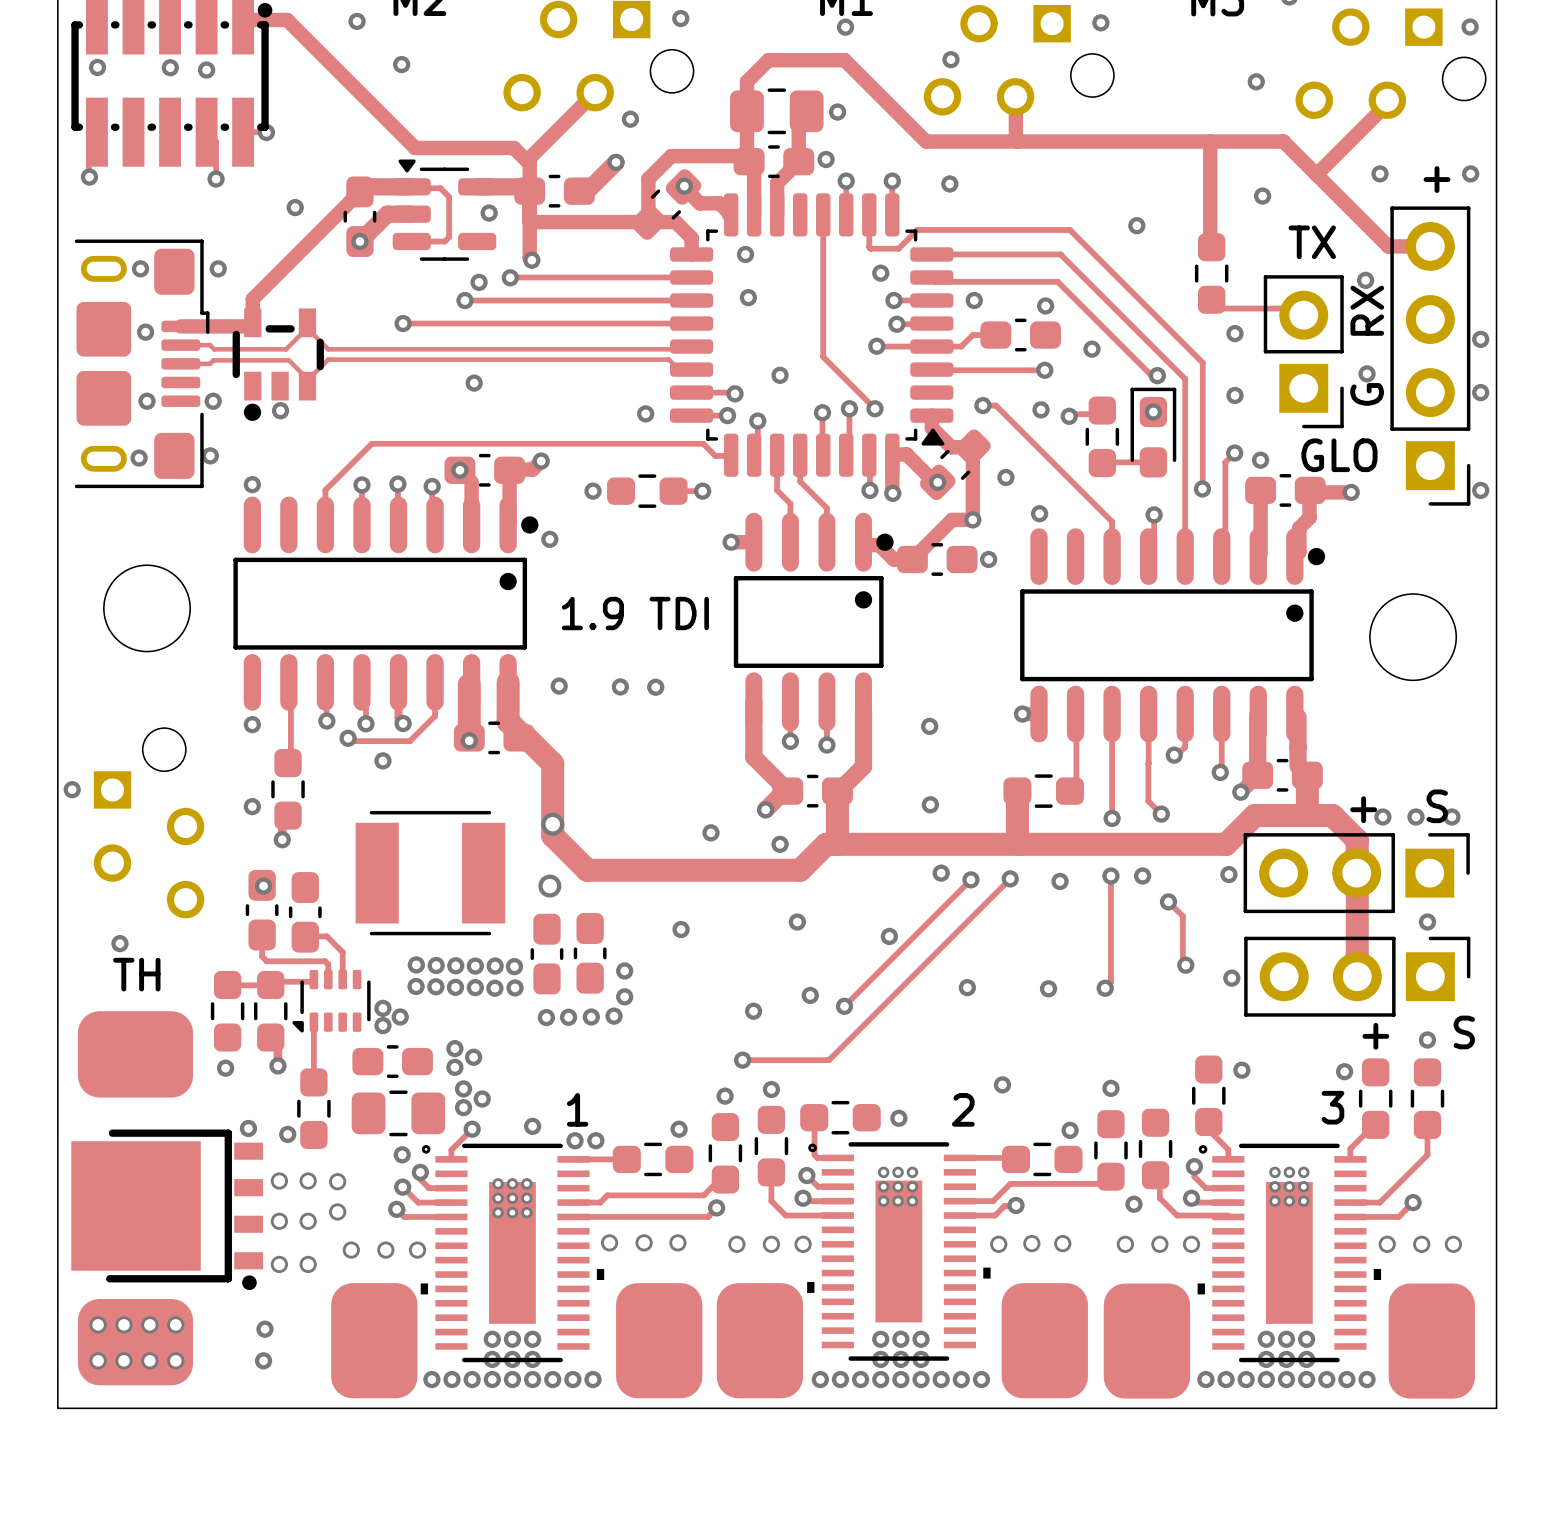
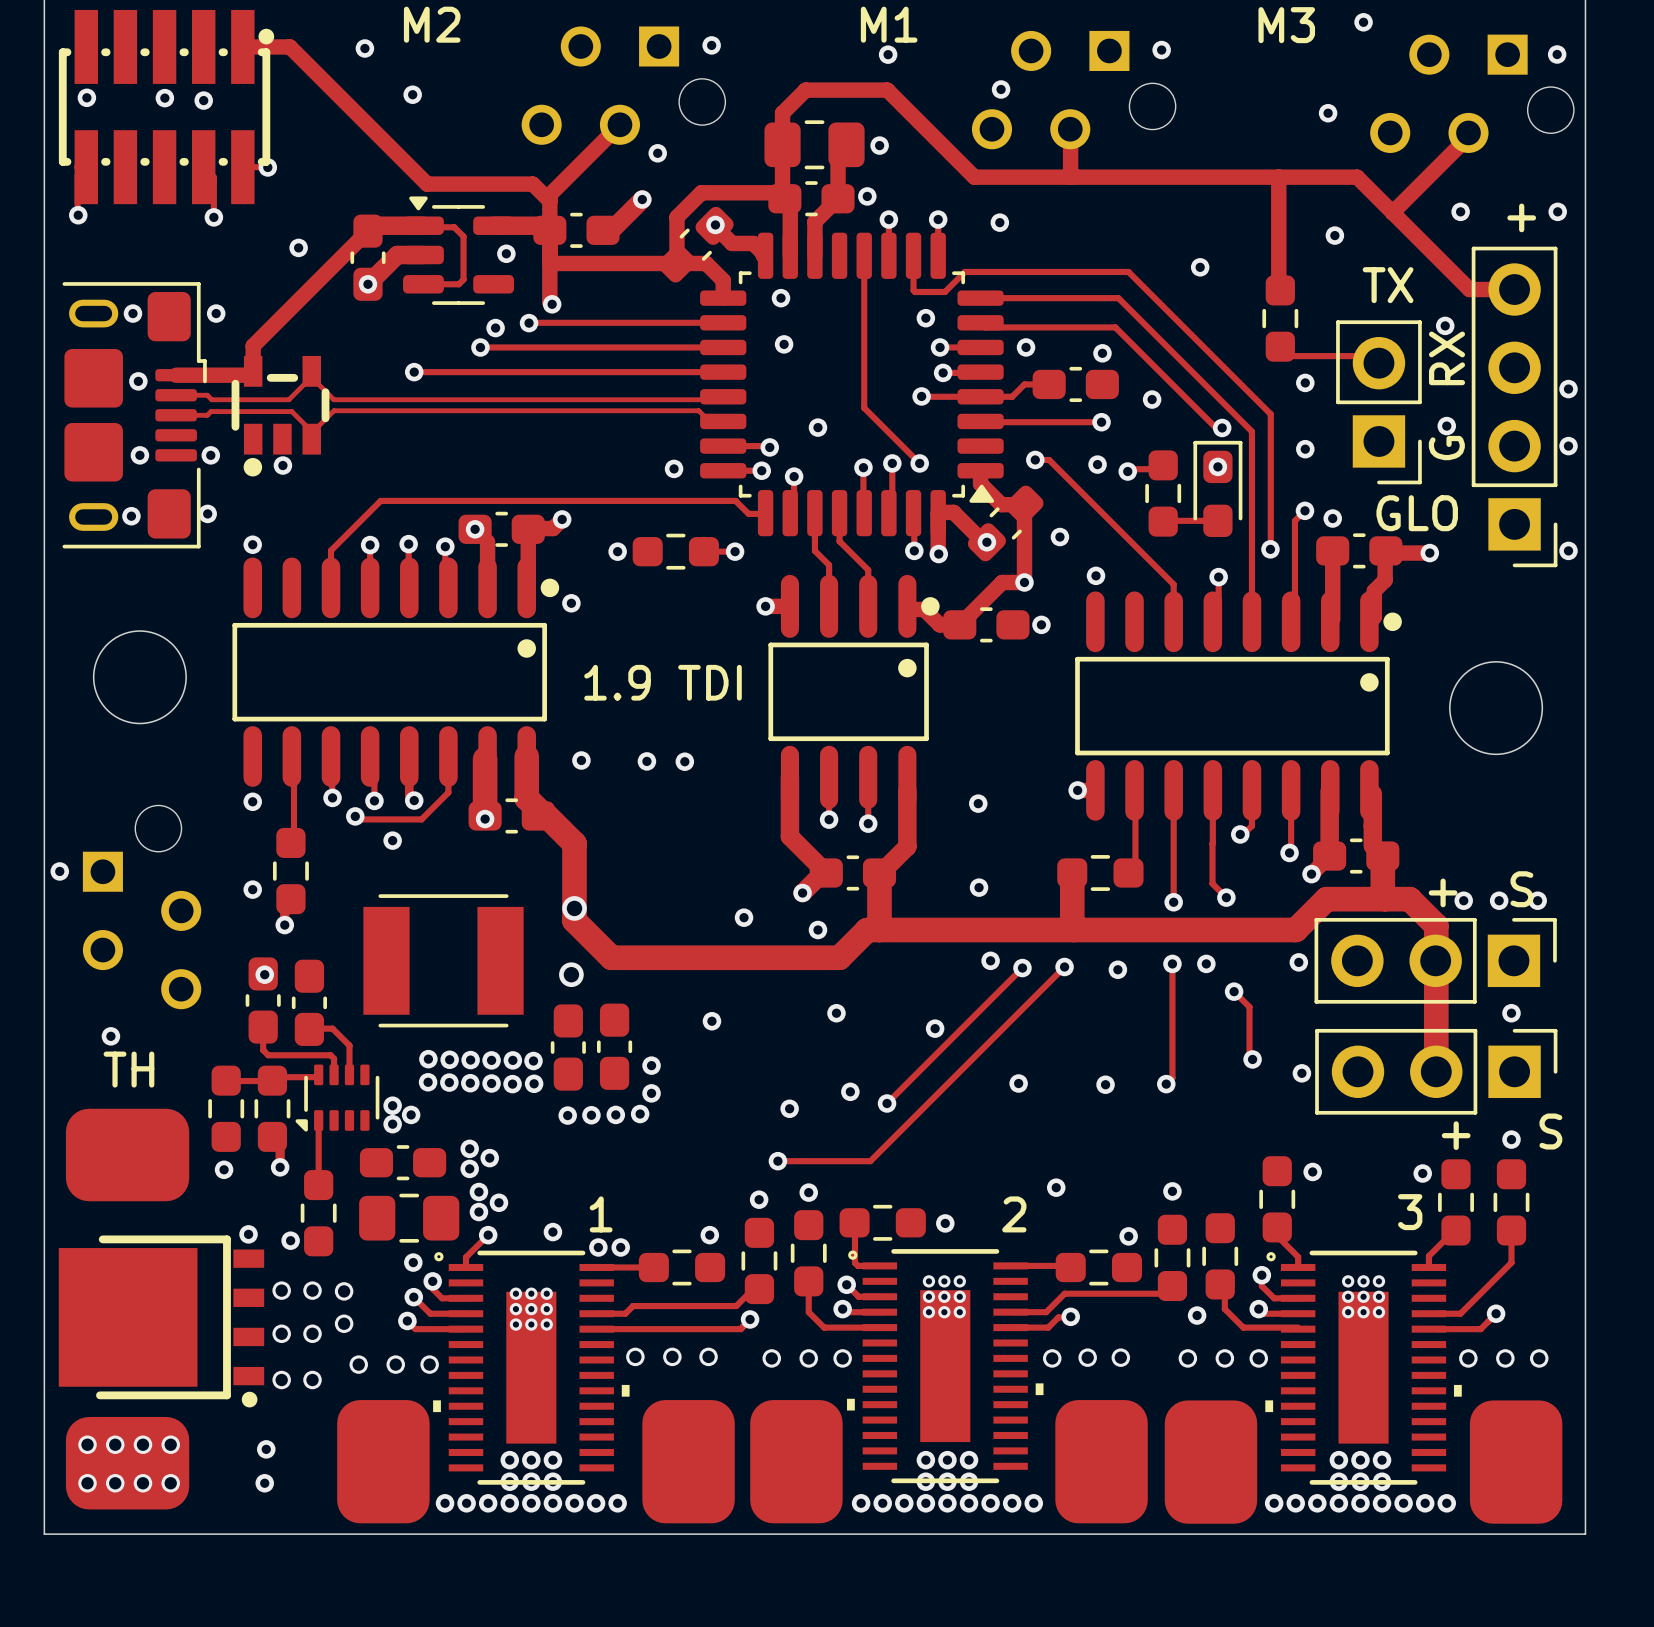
via: (474, 383) -> none

